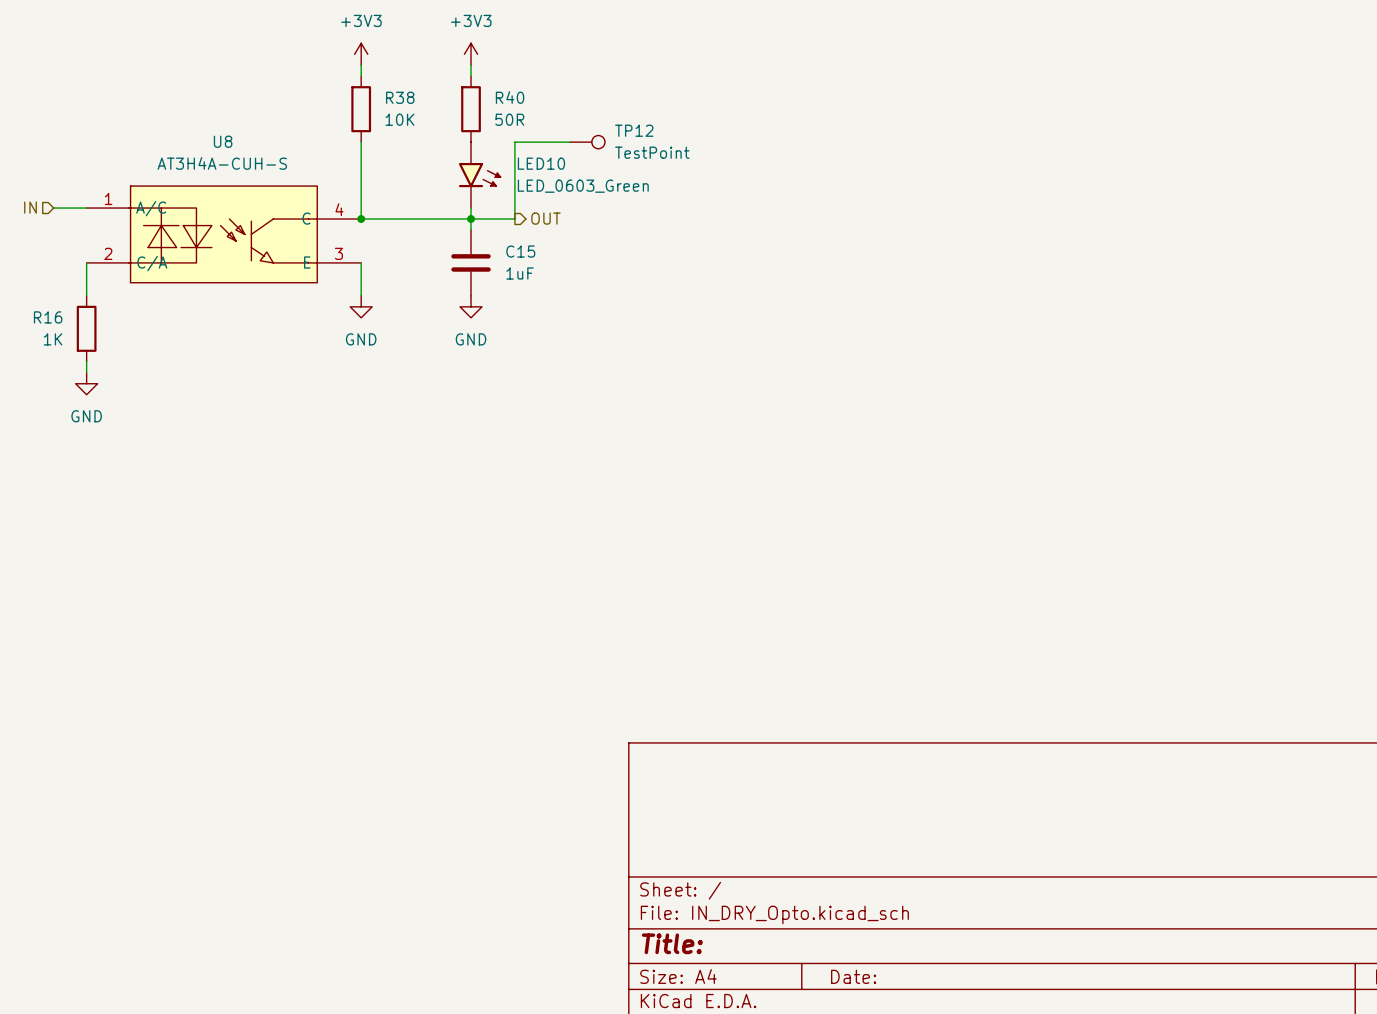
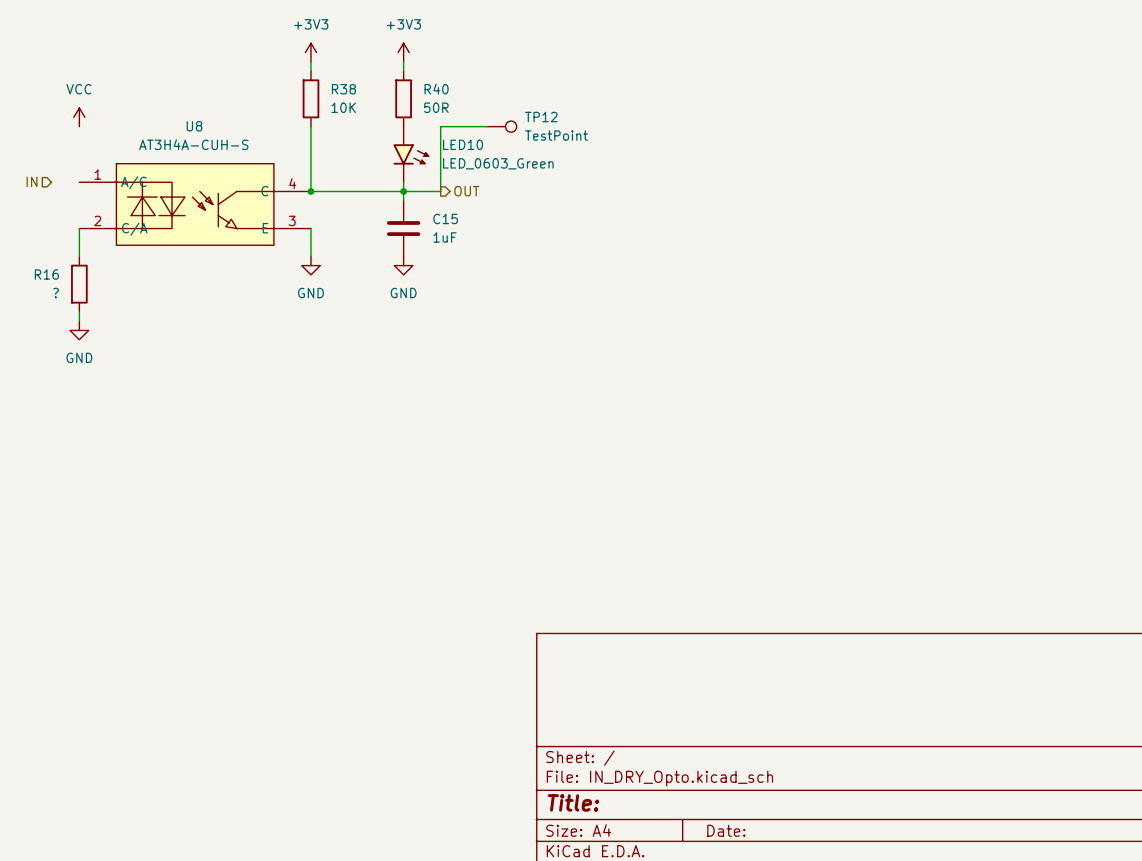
power symbol: none -> VCC (79, 117)
wire: (53, 208) (86, 208) -> none
R16 value: 1K (53, 339) -> ? (56, 293)

